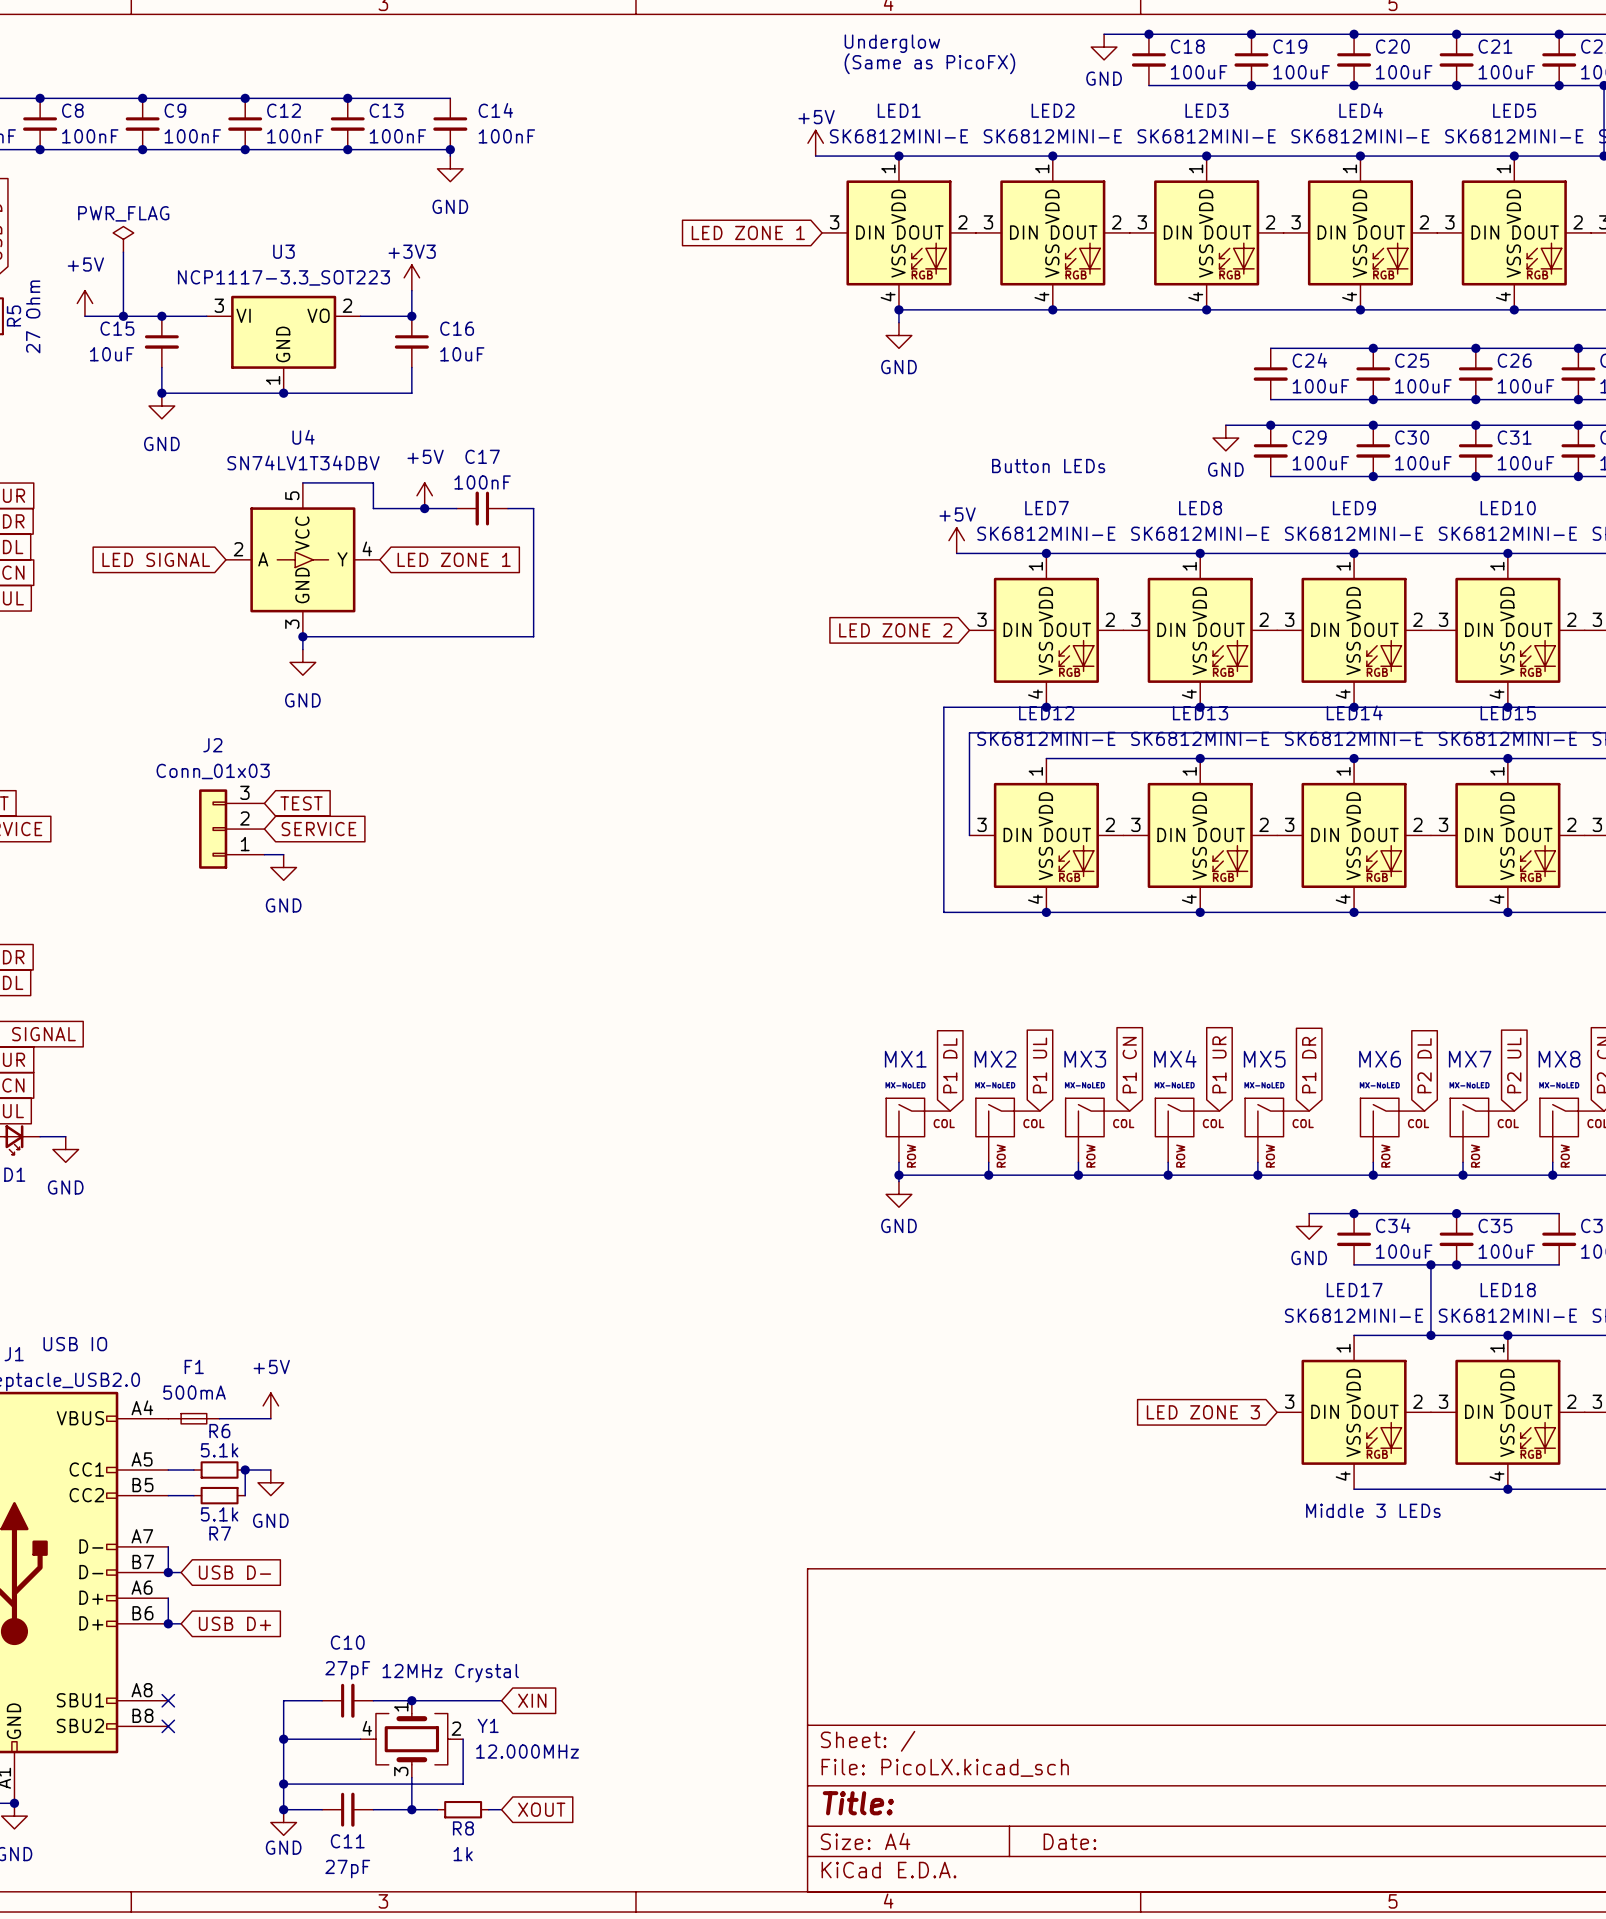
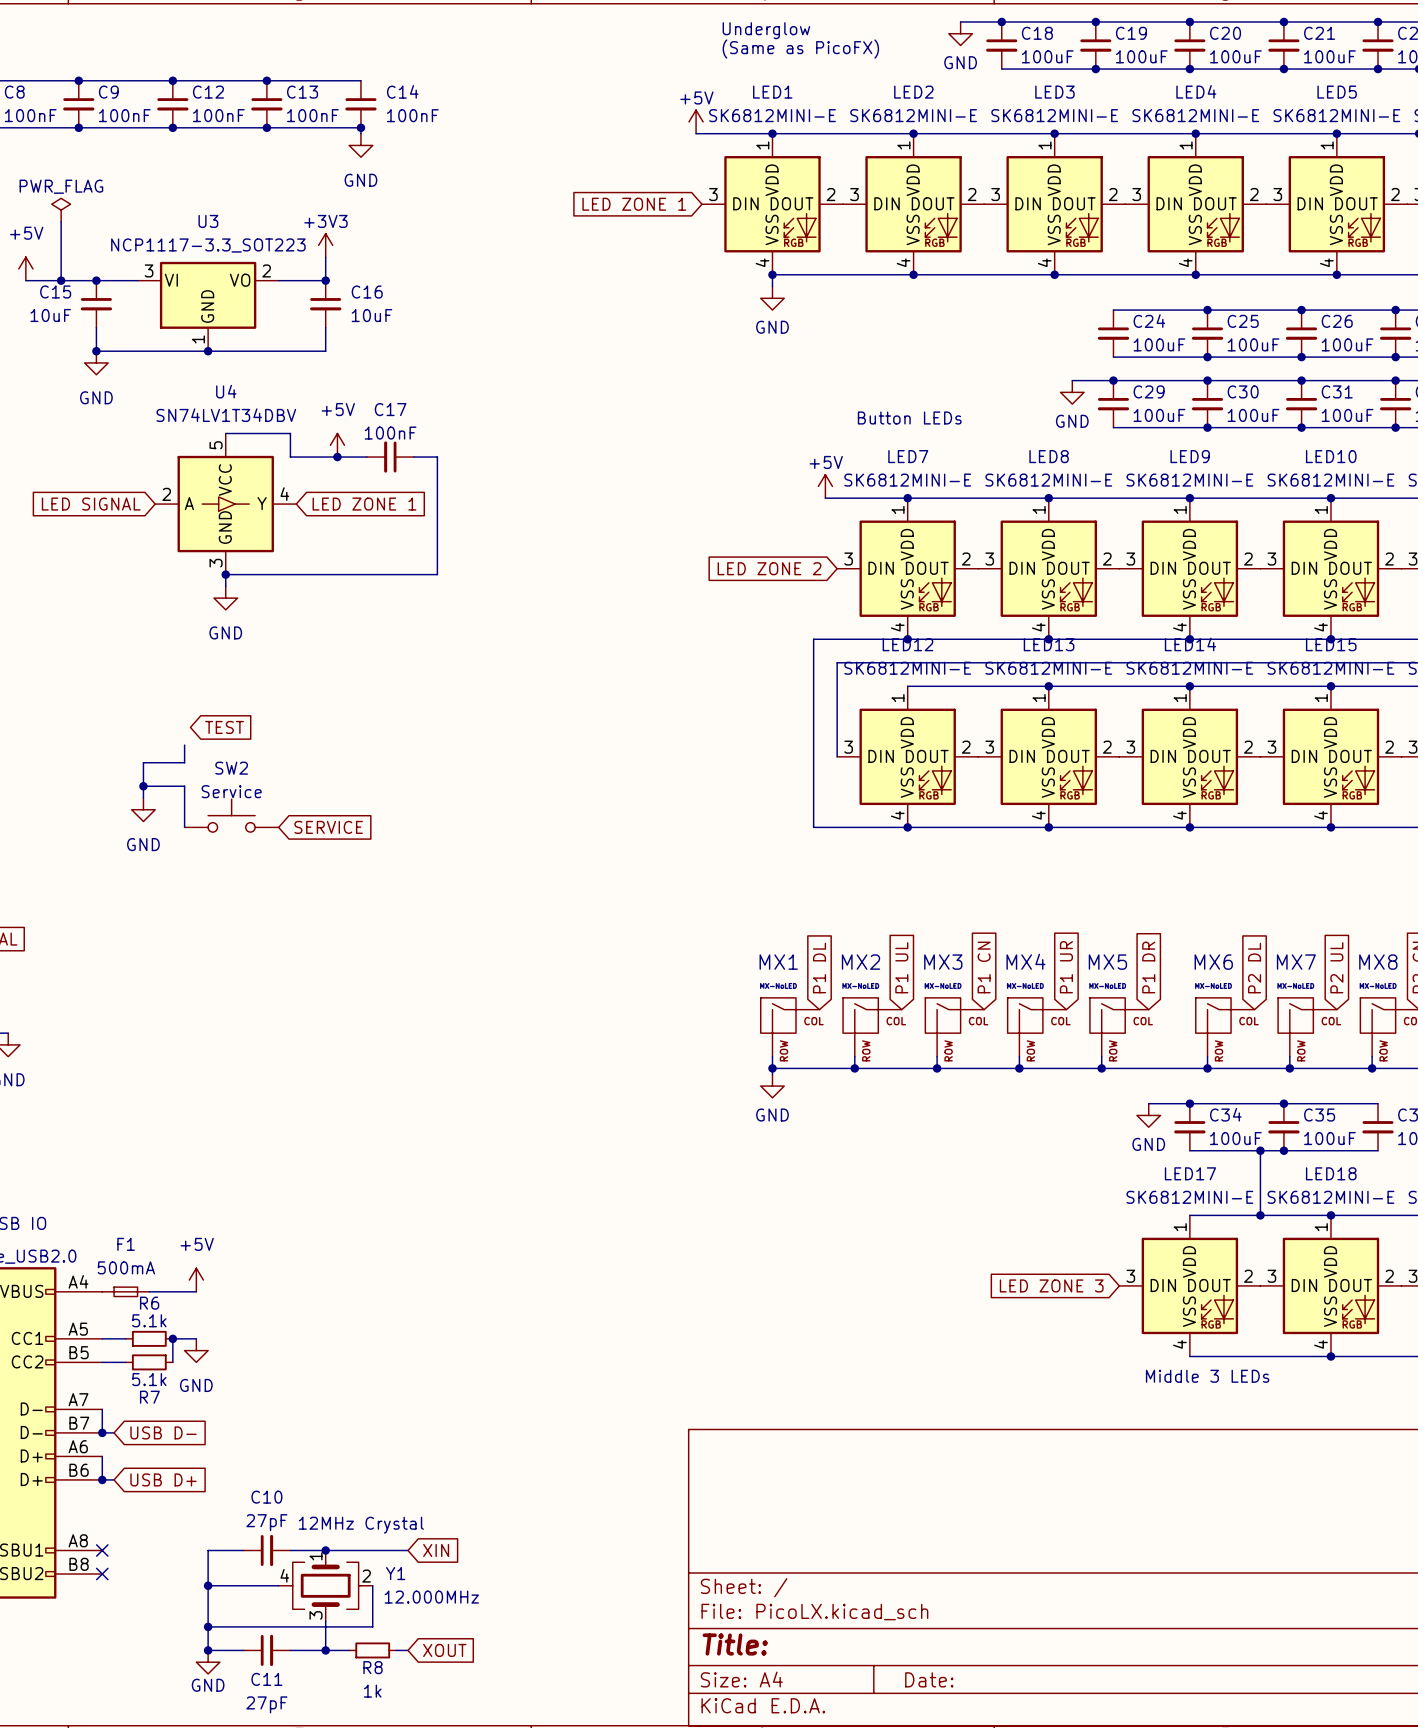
wire: none -> (184, 745) (184, 762) (143, 762) (143, 798)
J2: Conn_01x03 (231, 829) -> none
global label position: SERVICE (318, 829) -> SERVICE (328, 827)
wire: (264, 854) (283, 854) -> none
wire: none -> (143, 786) (184, 786) (184, 827)
junction: none -> (143, 786)
power symbol position: GND (283, 867) -> GND (143, 809)
SW2: none -> Service (231, 815)

